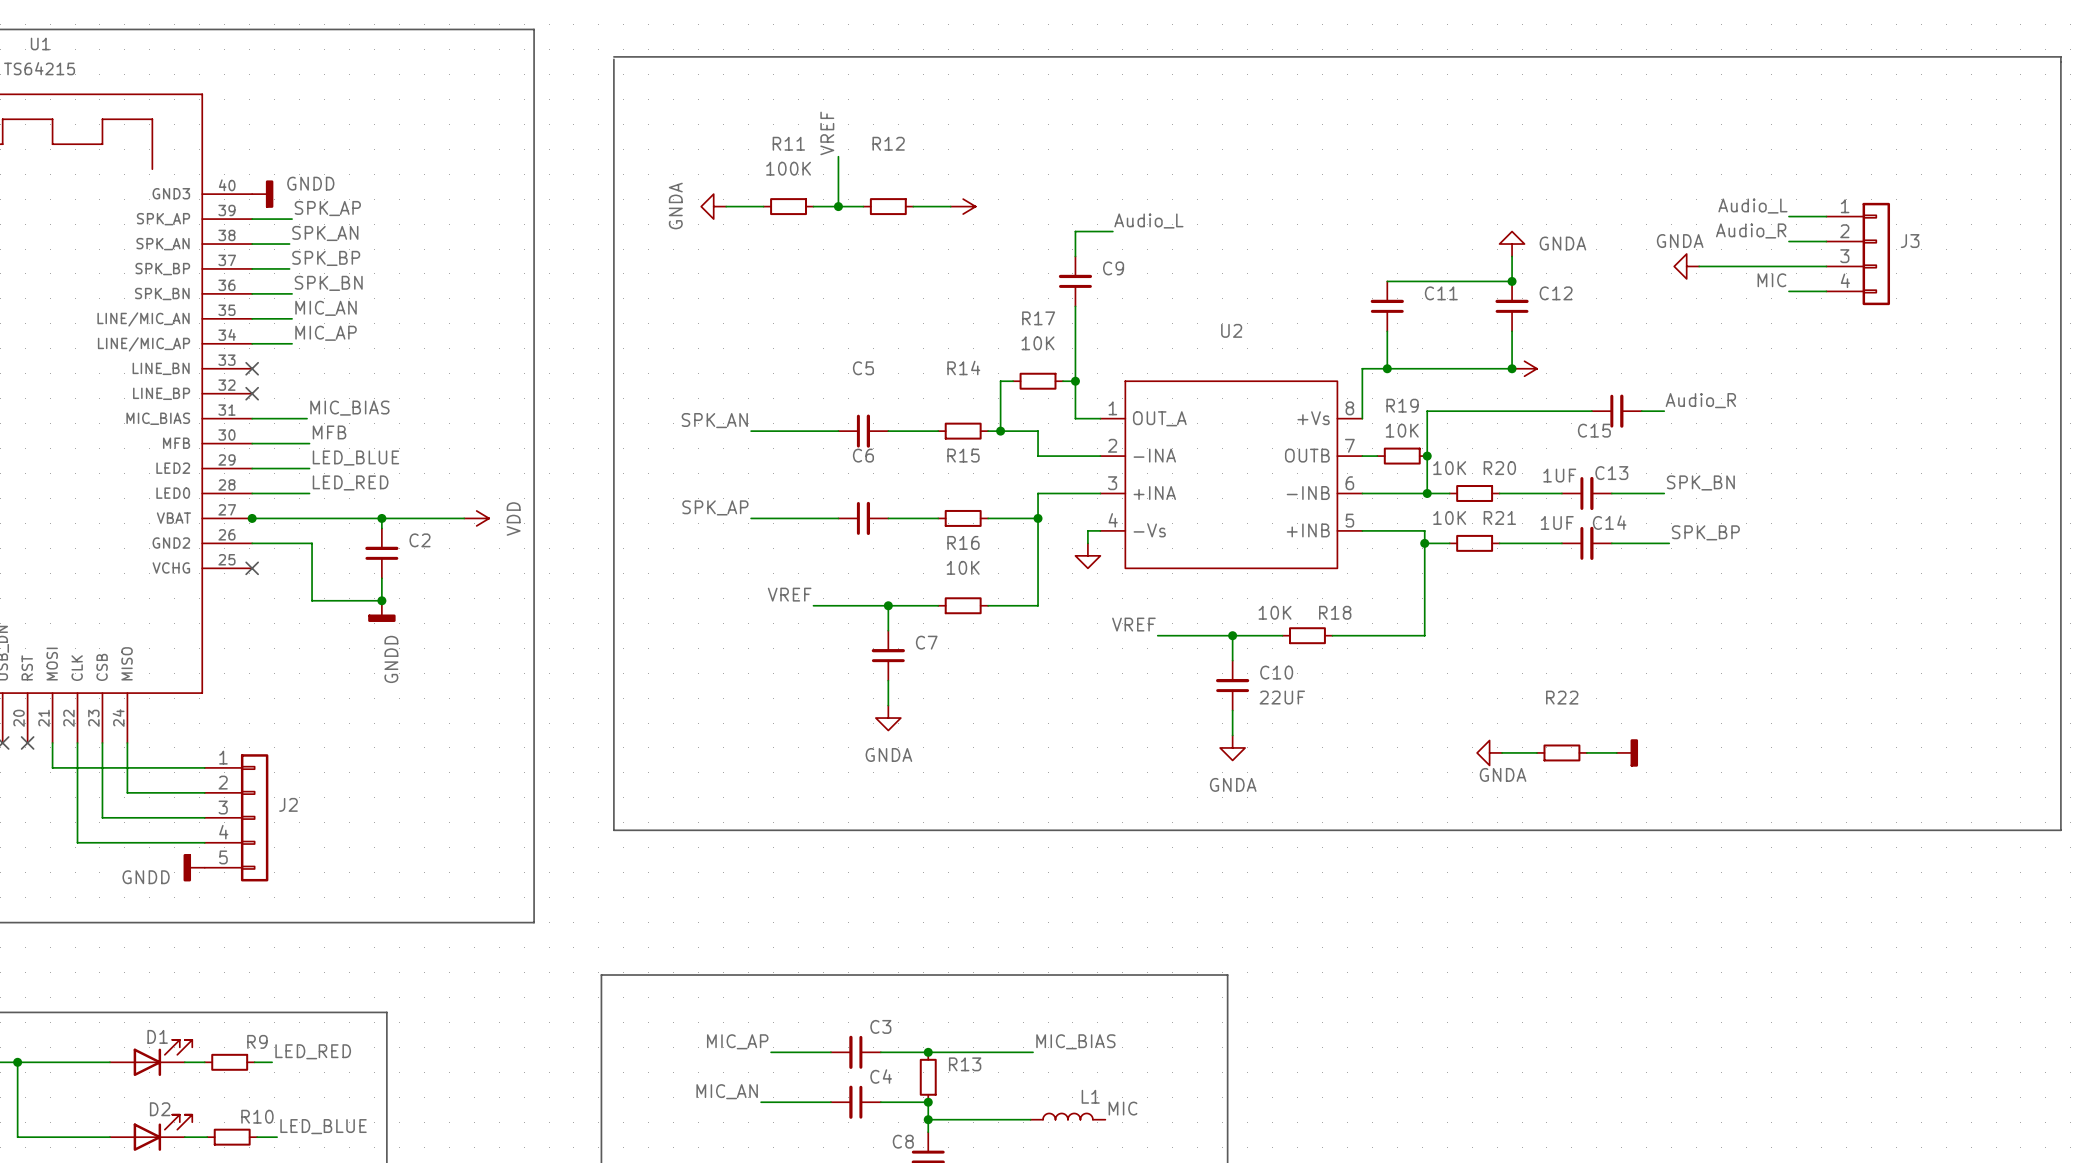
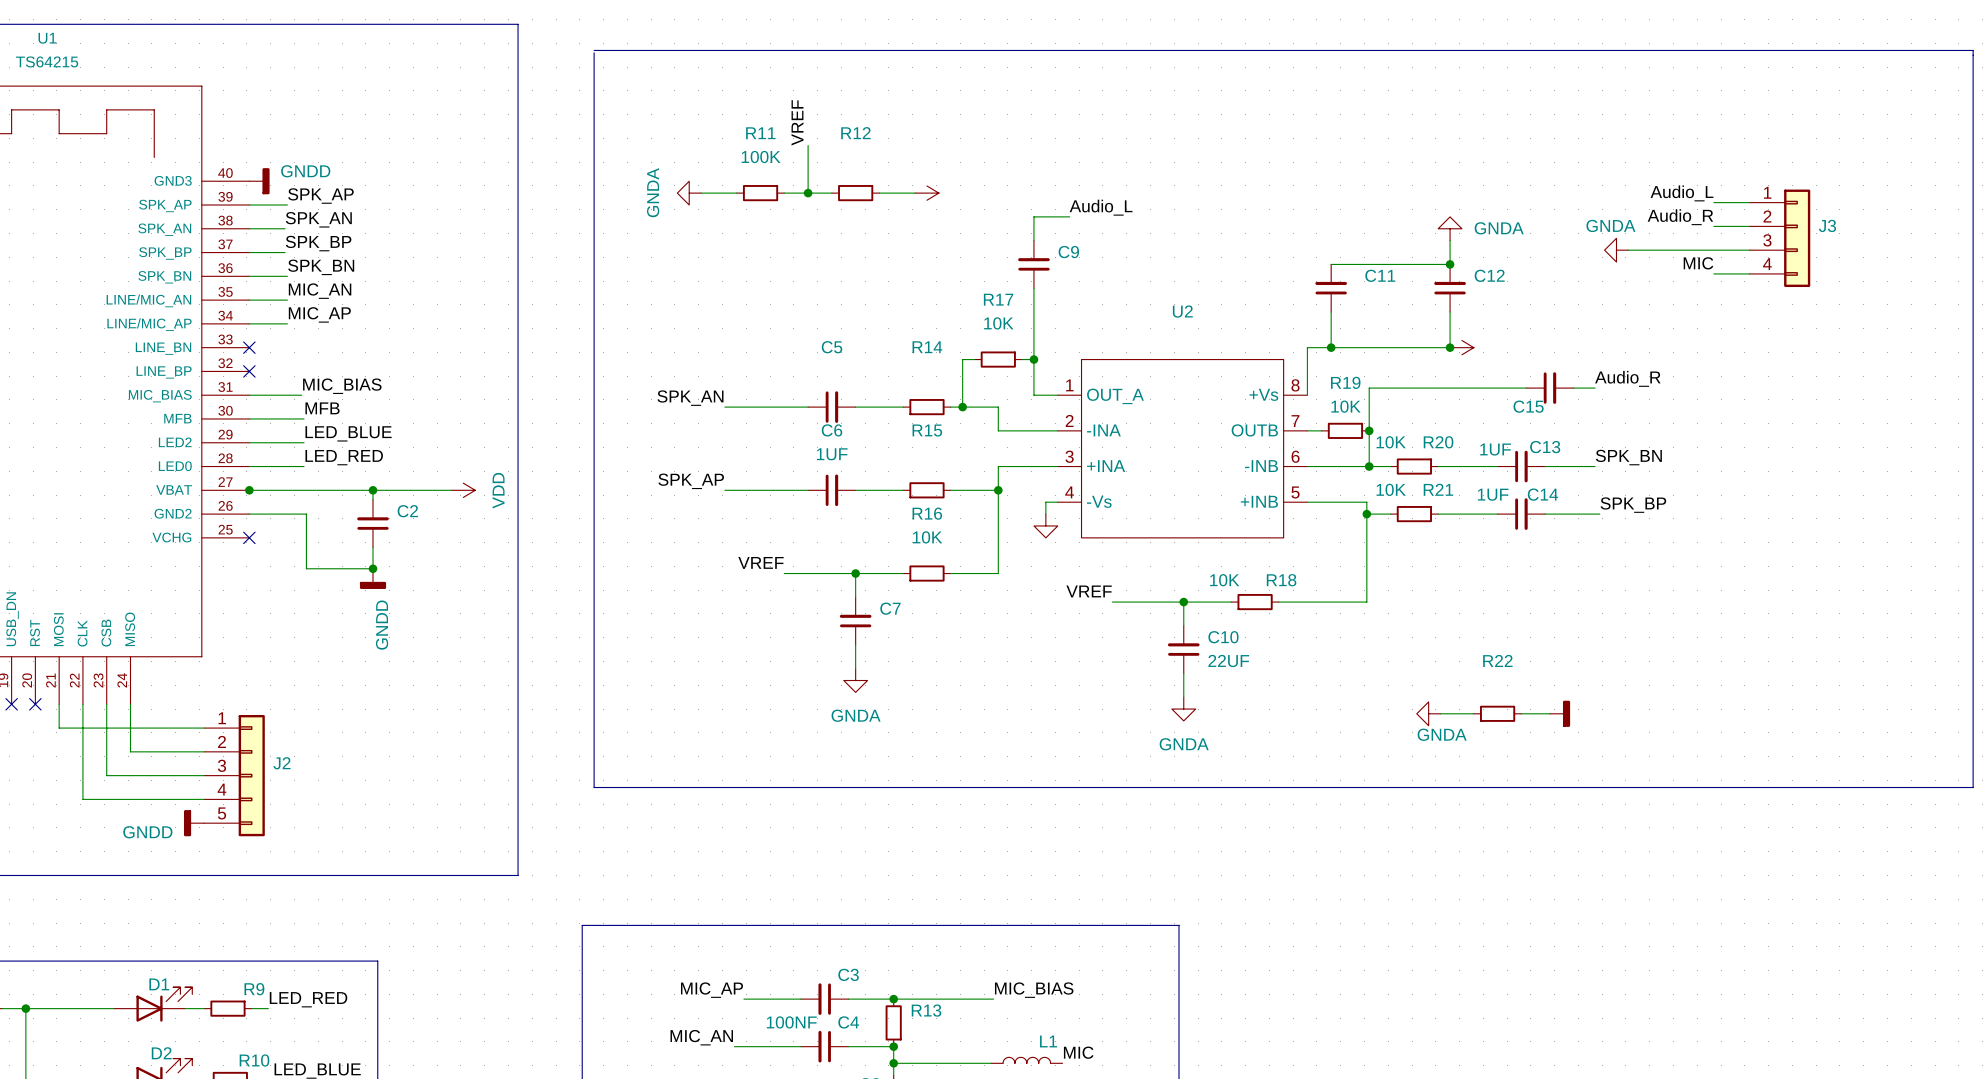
C6 value: none -> 1UF (832, 454)
C4 value: none -> 100NF (791, 1022)

